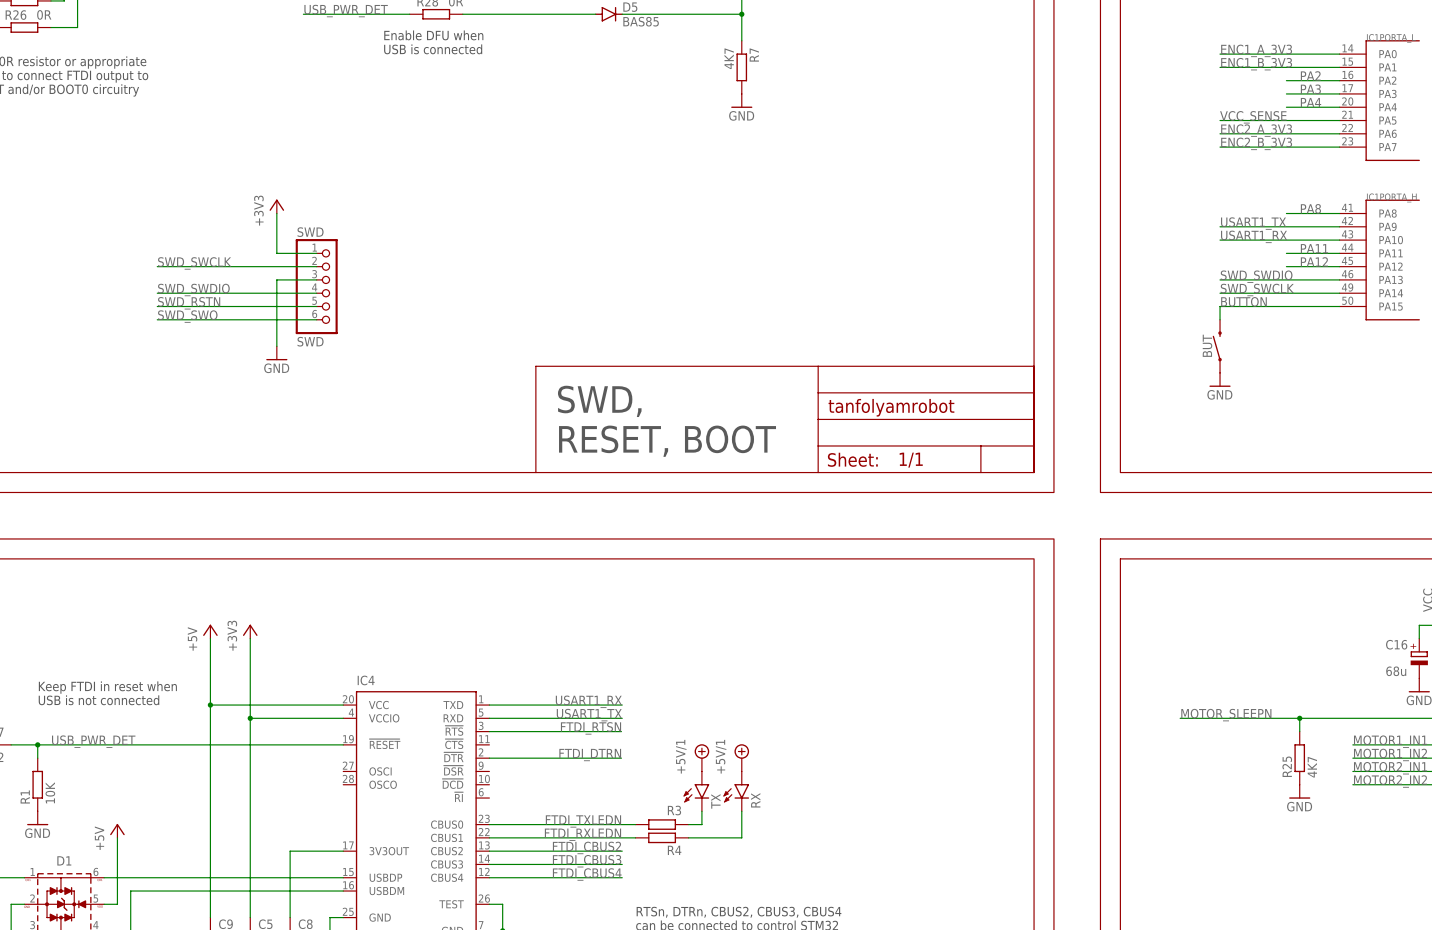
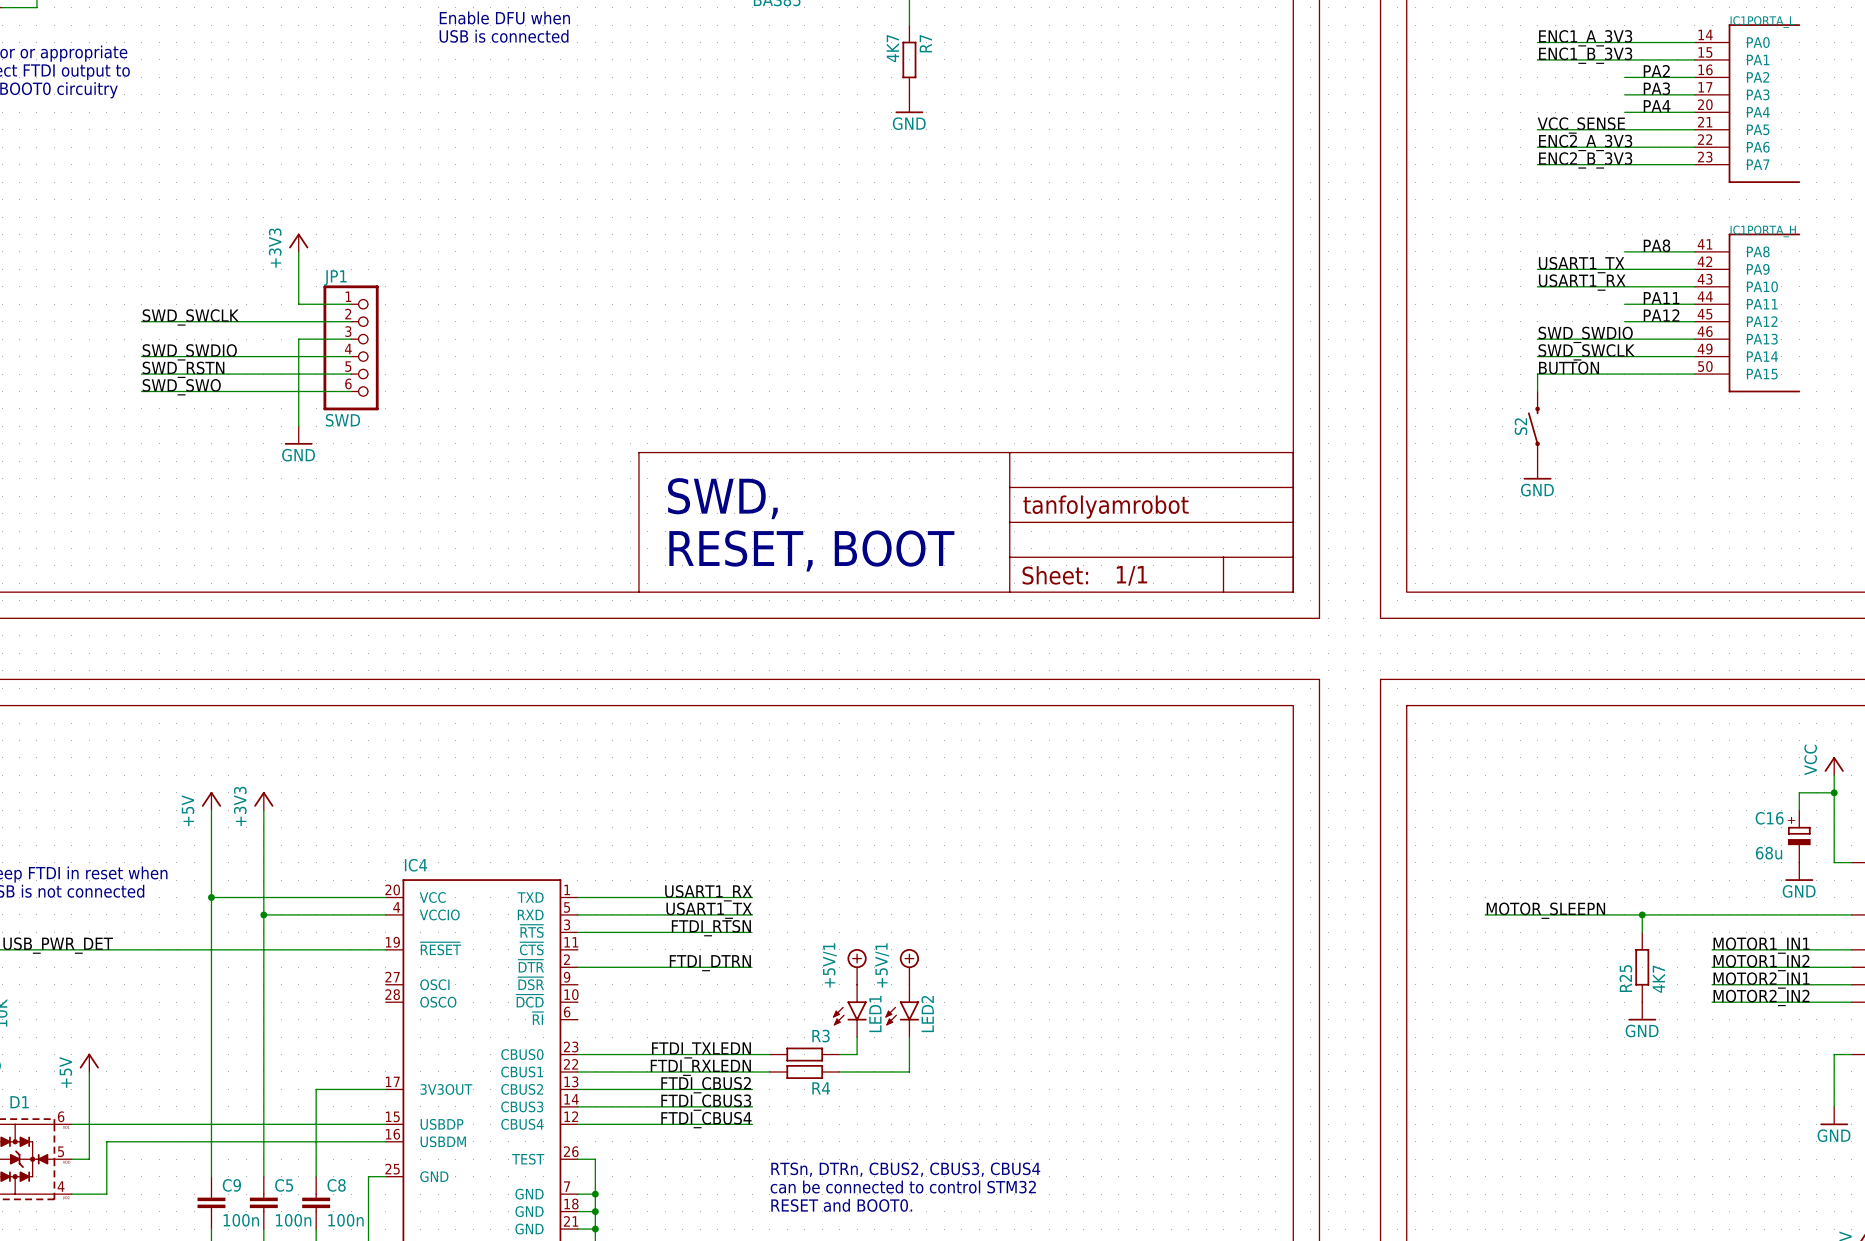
SWD name: SWD (310, 232) -> JP1 (335, 278)
BUT name: BUT (1207, 345) -> S2 (1521, 426)
RX name: RX (755, 800) -> LED2 (927, 1014)
TX name: TX (715, 801) -> LED1 (875, 1014)

